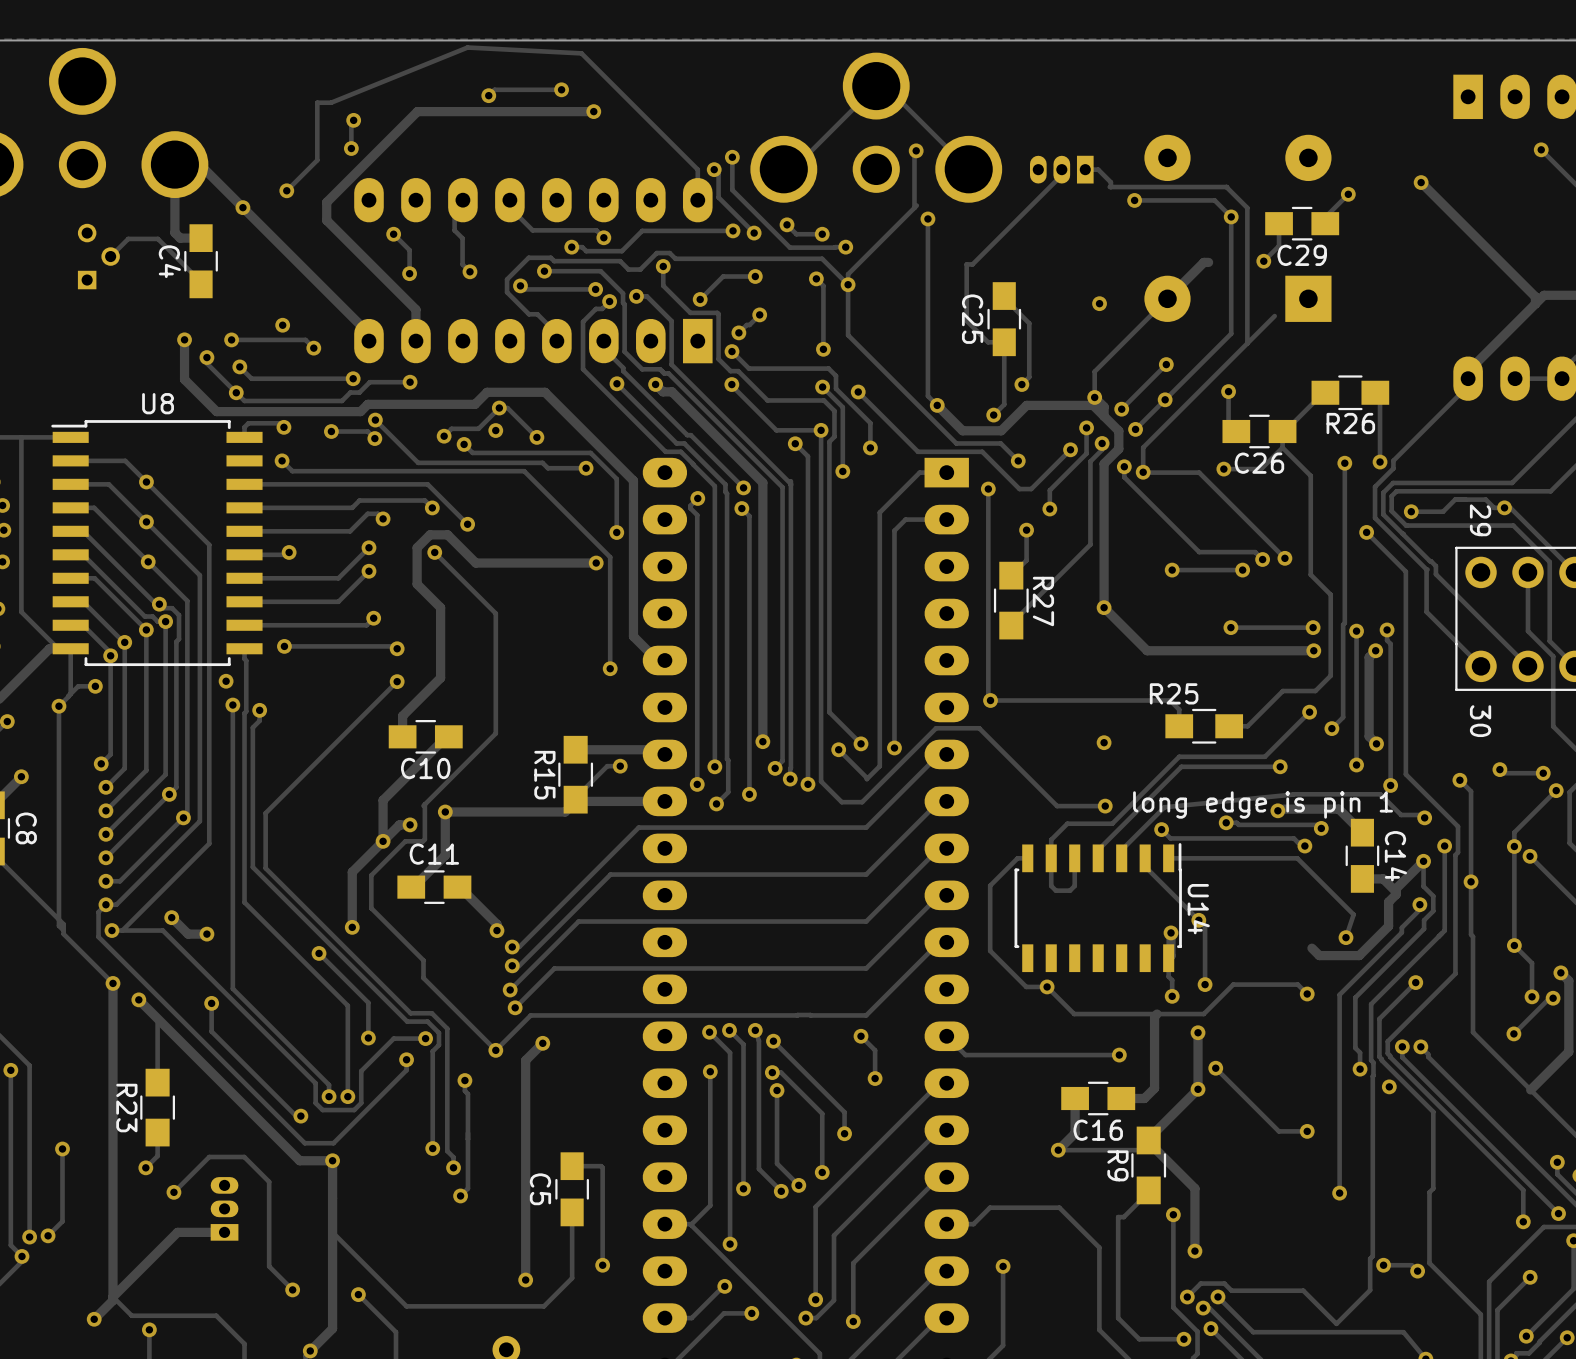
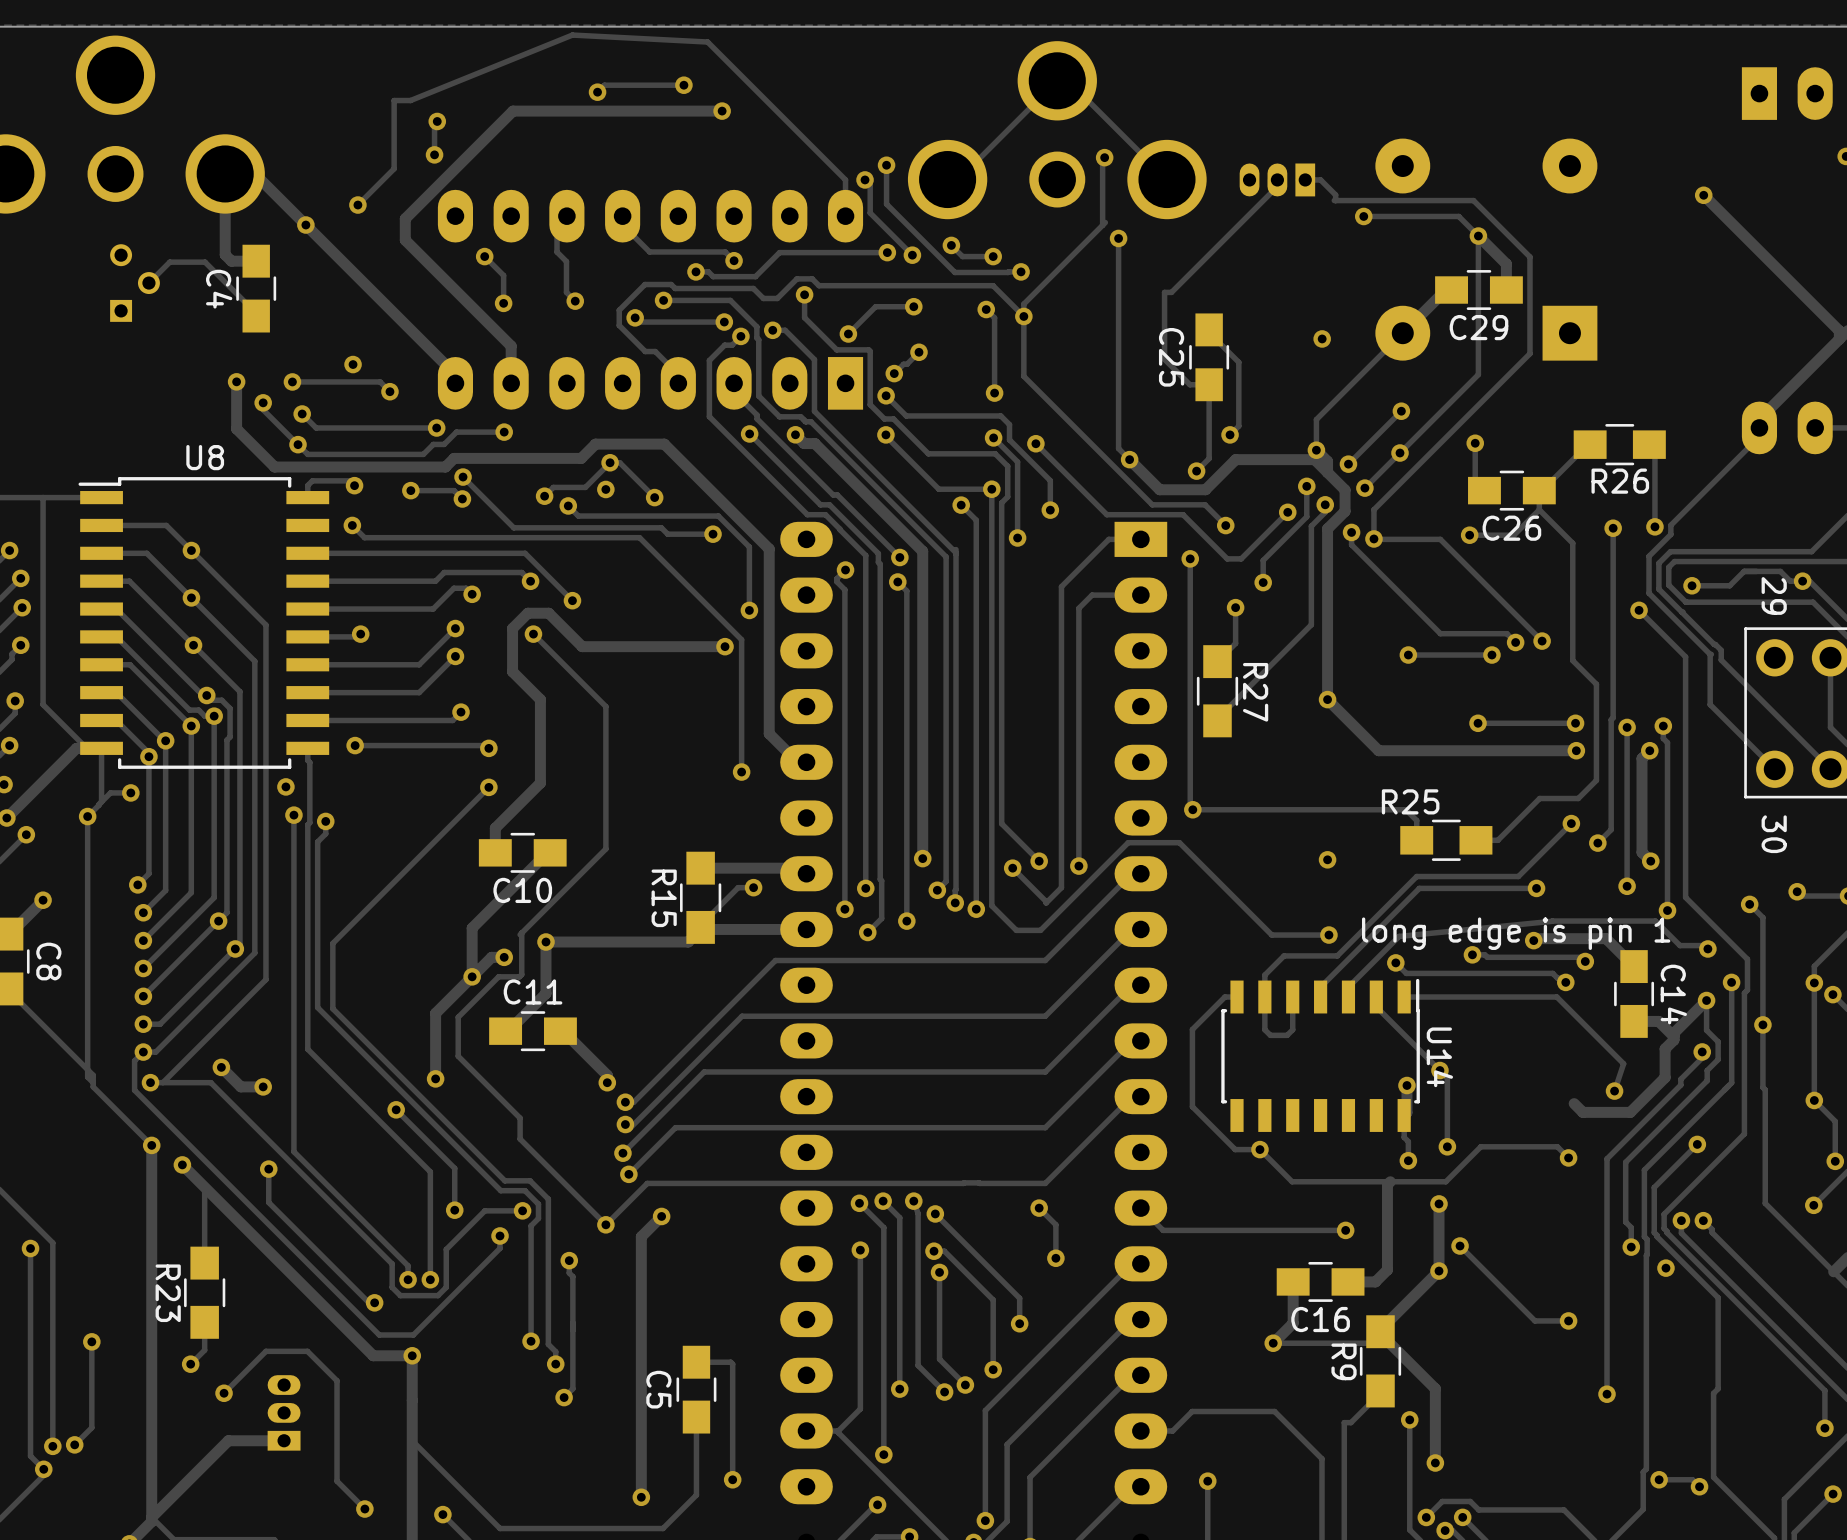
track: (1226, 187) (1247, 207) (1247, 343) -> (1473, 200) (1529, 256) (1529, 353)
track: (1348, 194) (1325, 217) (1325, 223) -> none
via: (1348, 194) -> none
track: none -> (1478, 236) (1506, 264) (1506, 290)
track: (1279, 223) (1279, 245) (1263, 261) -> none
C29 position: (1302, 223) -> (1478, 290)
via: (1263, 261) -> none

